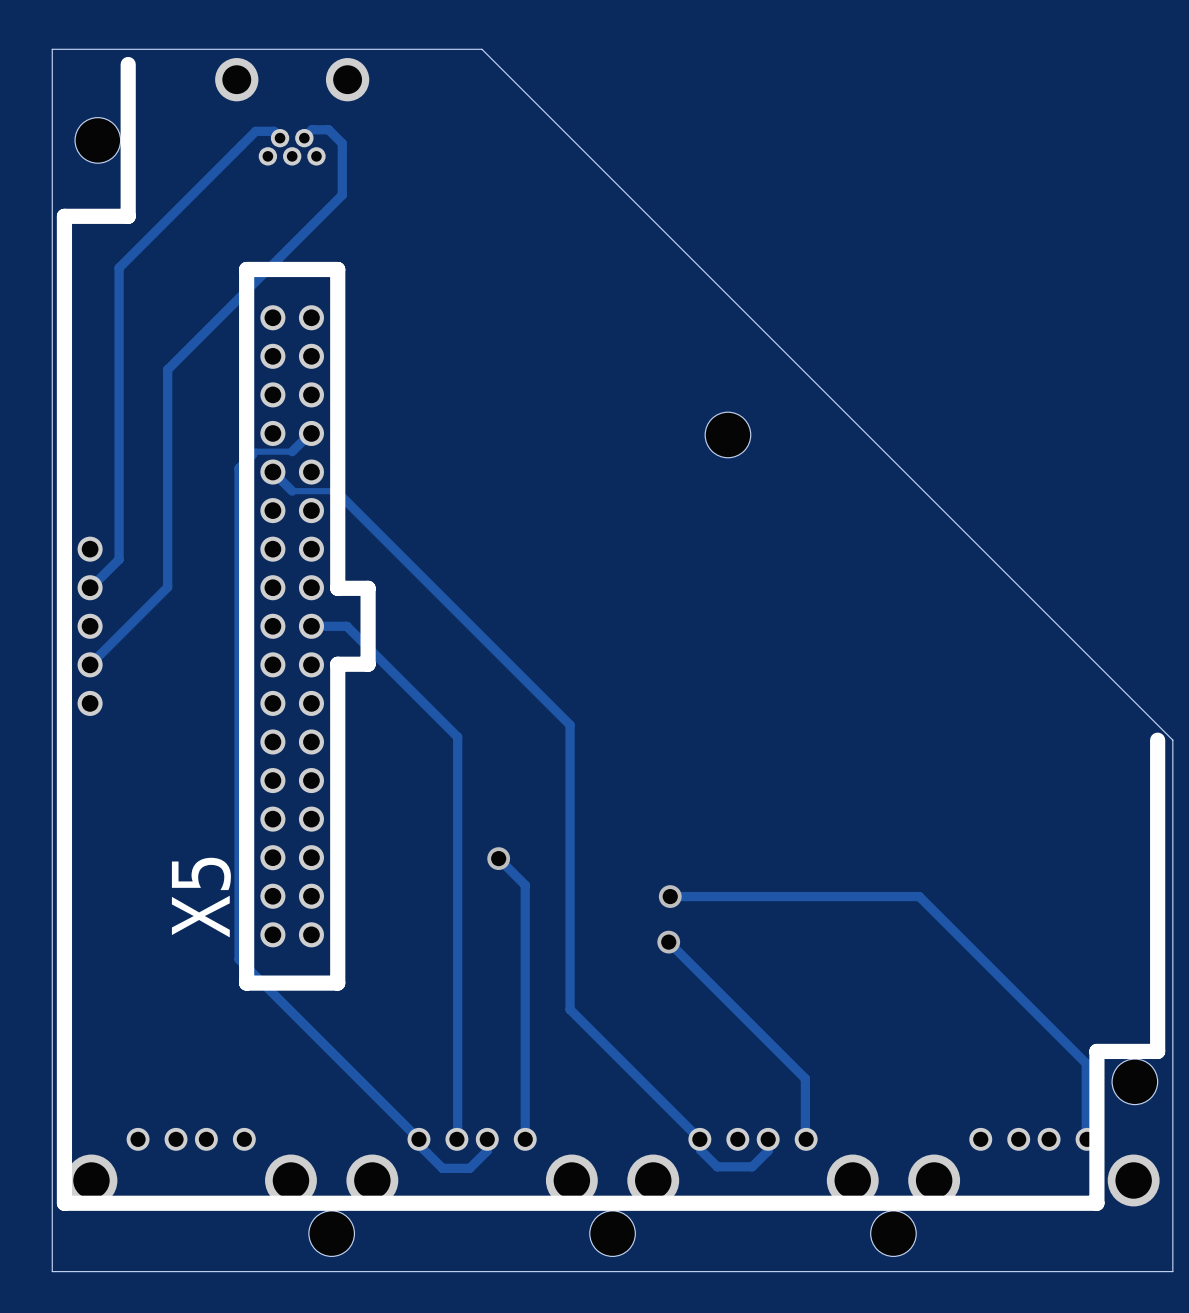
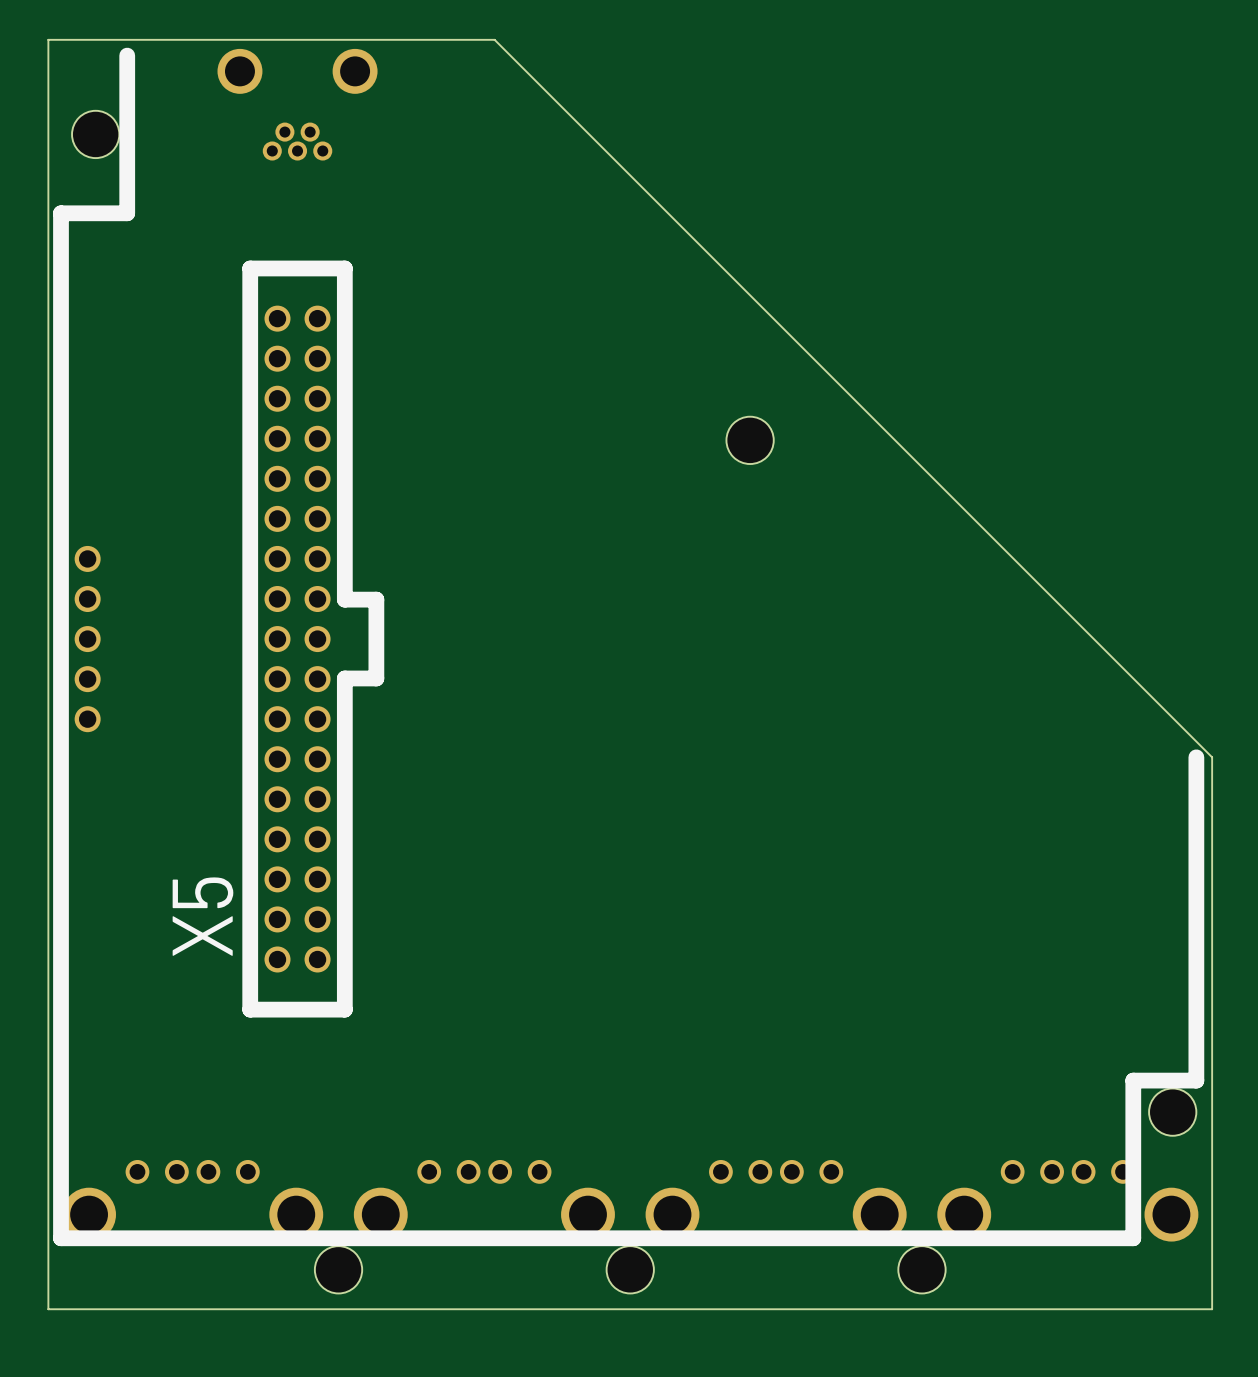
track: (280, 138) (273, 131) (255, 131) (119, 267) (119, 559) (90, 587) -> none
track: (304, 138) (311, 129) (328, 129) (342, 143) (342, 195) (167, 369) (167, 587) (90, 664) -> none
track: (311, 433) (292, 451) (255, 451) (239, 468) (239, 959) (422, 1143) (422, 1148) (442, 1168) (469, 1168) (487, 1150) (487, 1139) -> none
track: (273, 472) (292, 491) (336, 491) (570, 724) (570, 1009) (700, 1140) (700, 1150) (717, 1166) (752, 1166) (768, 1150) (768, 1139) -> none
track: (311, 626) (346, 626) (457, 737) (456, 1139) -> none
track: (498, 858) (525, 885) (525, 1139) -> none
via: (498, 858) -> none
track: (670, 896) (919, 896) (1086, 1063) (1087, 1139) -> none
via: (670, 896) -> none
track: (668, 942) (805, 1078) (806, 1139) -> none
via: (668, 942) -> none

